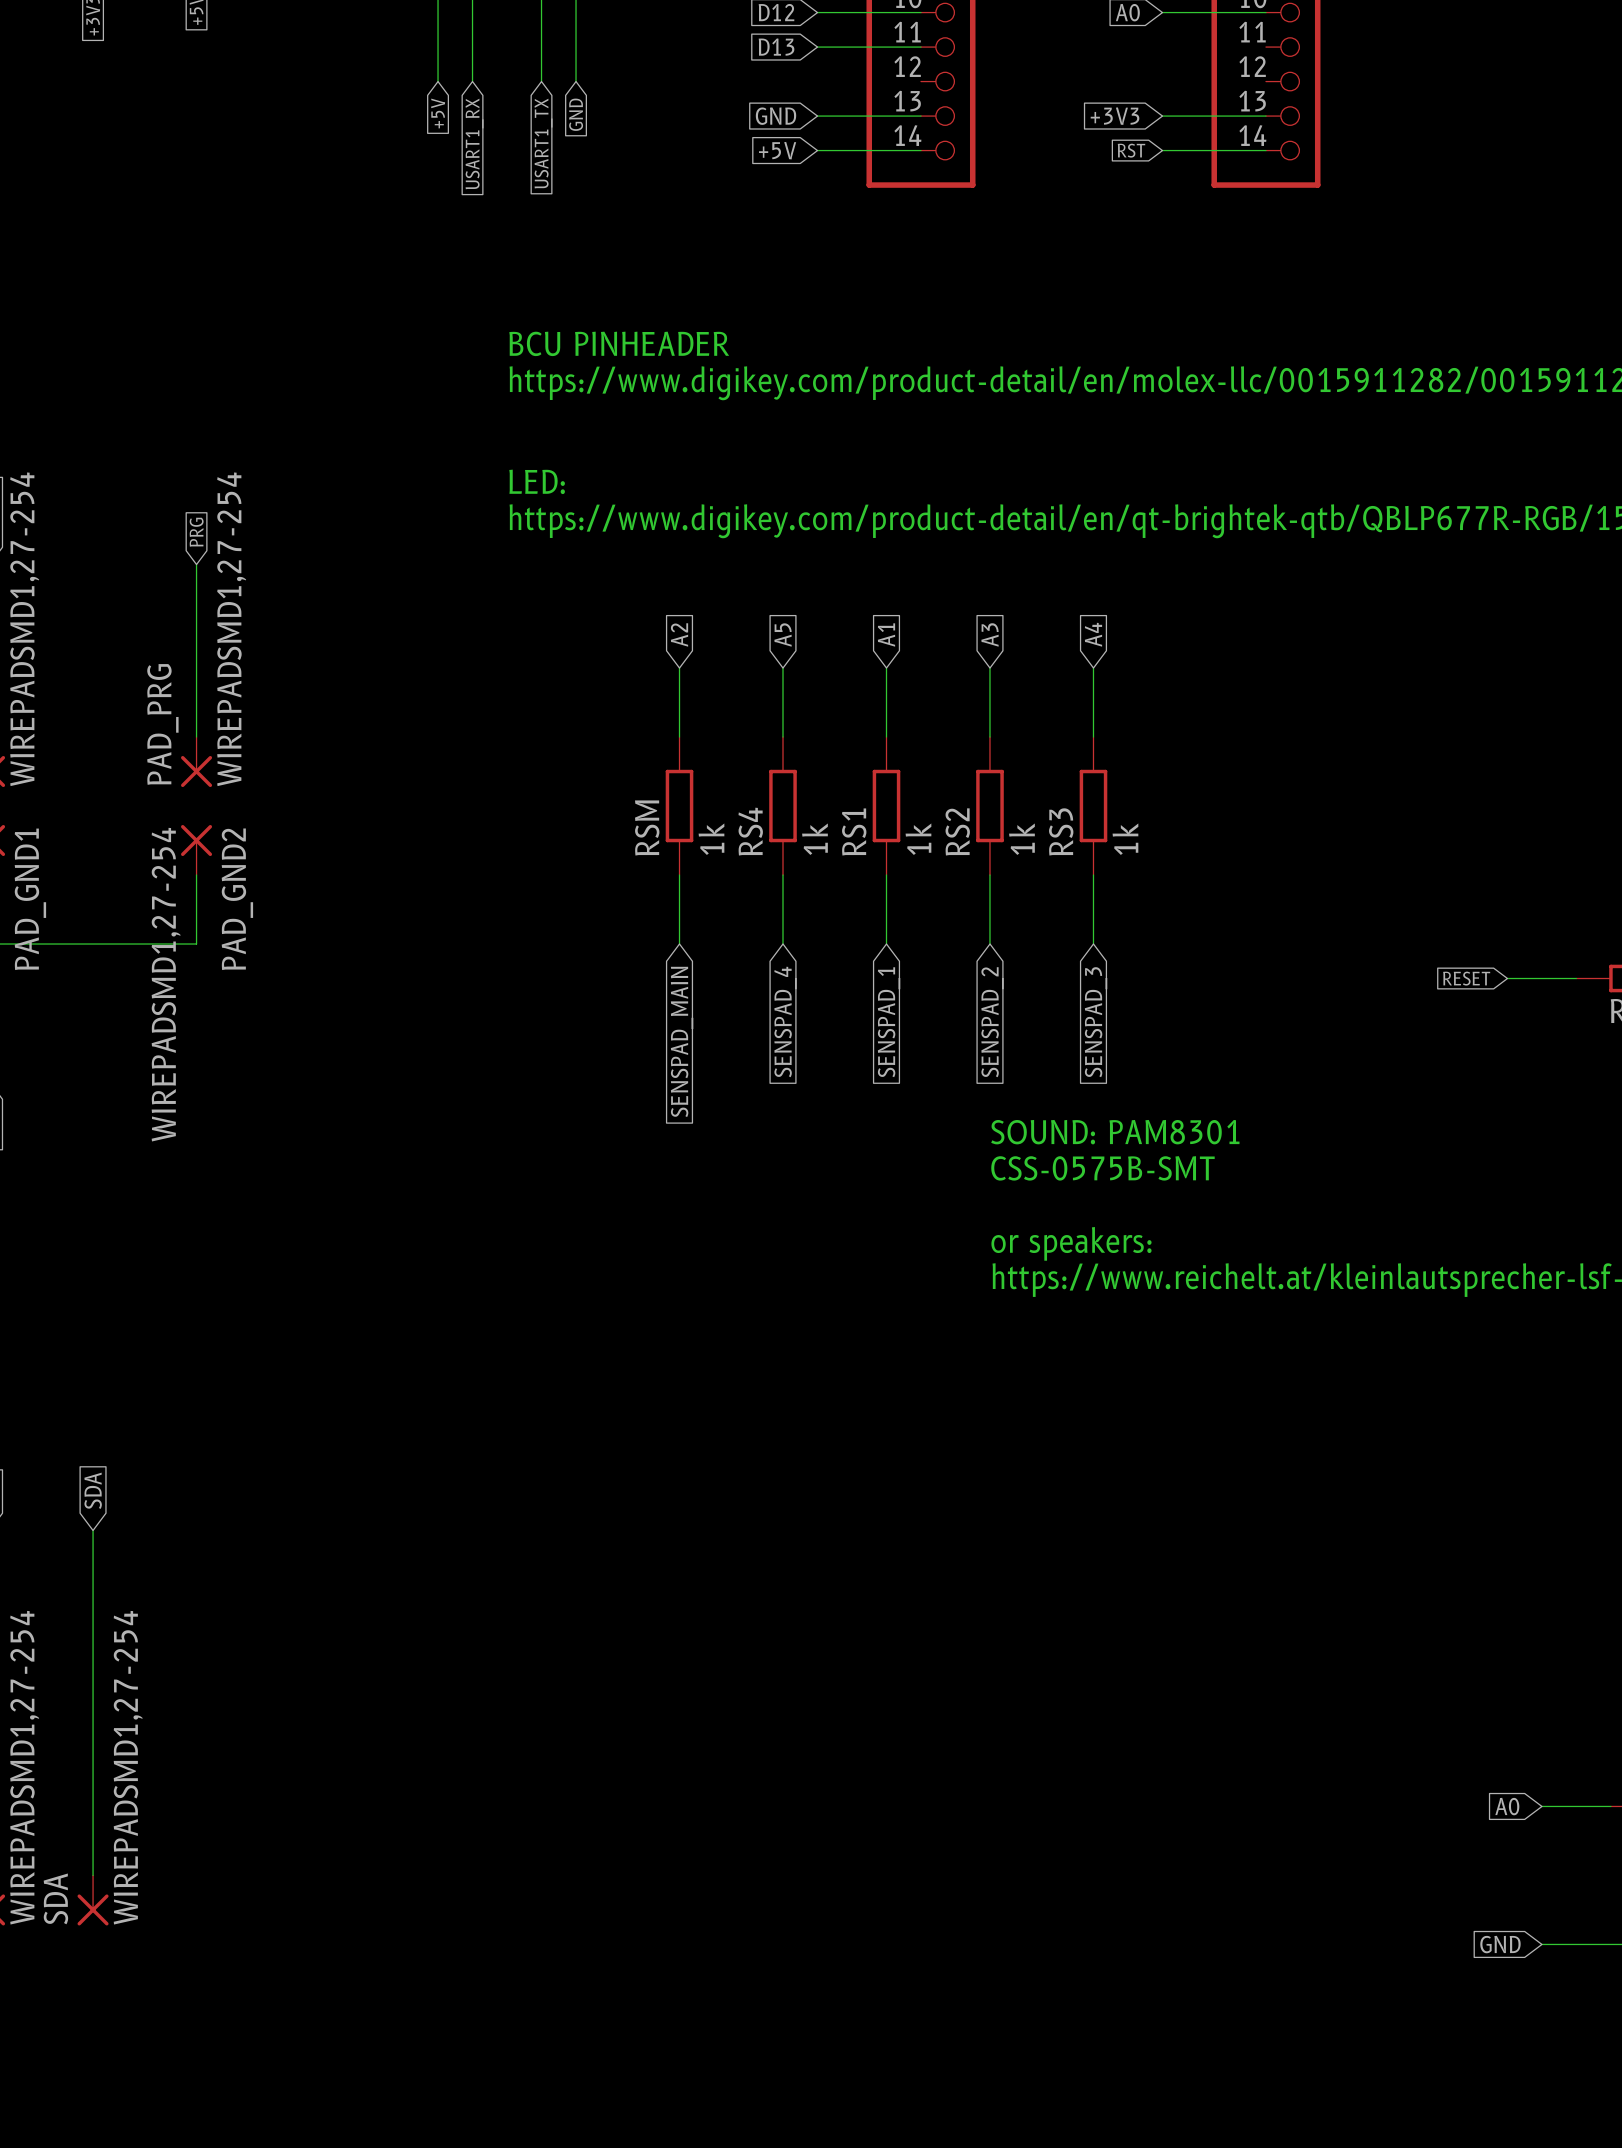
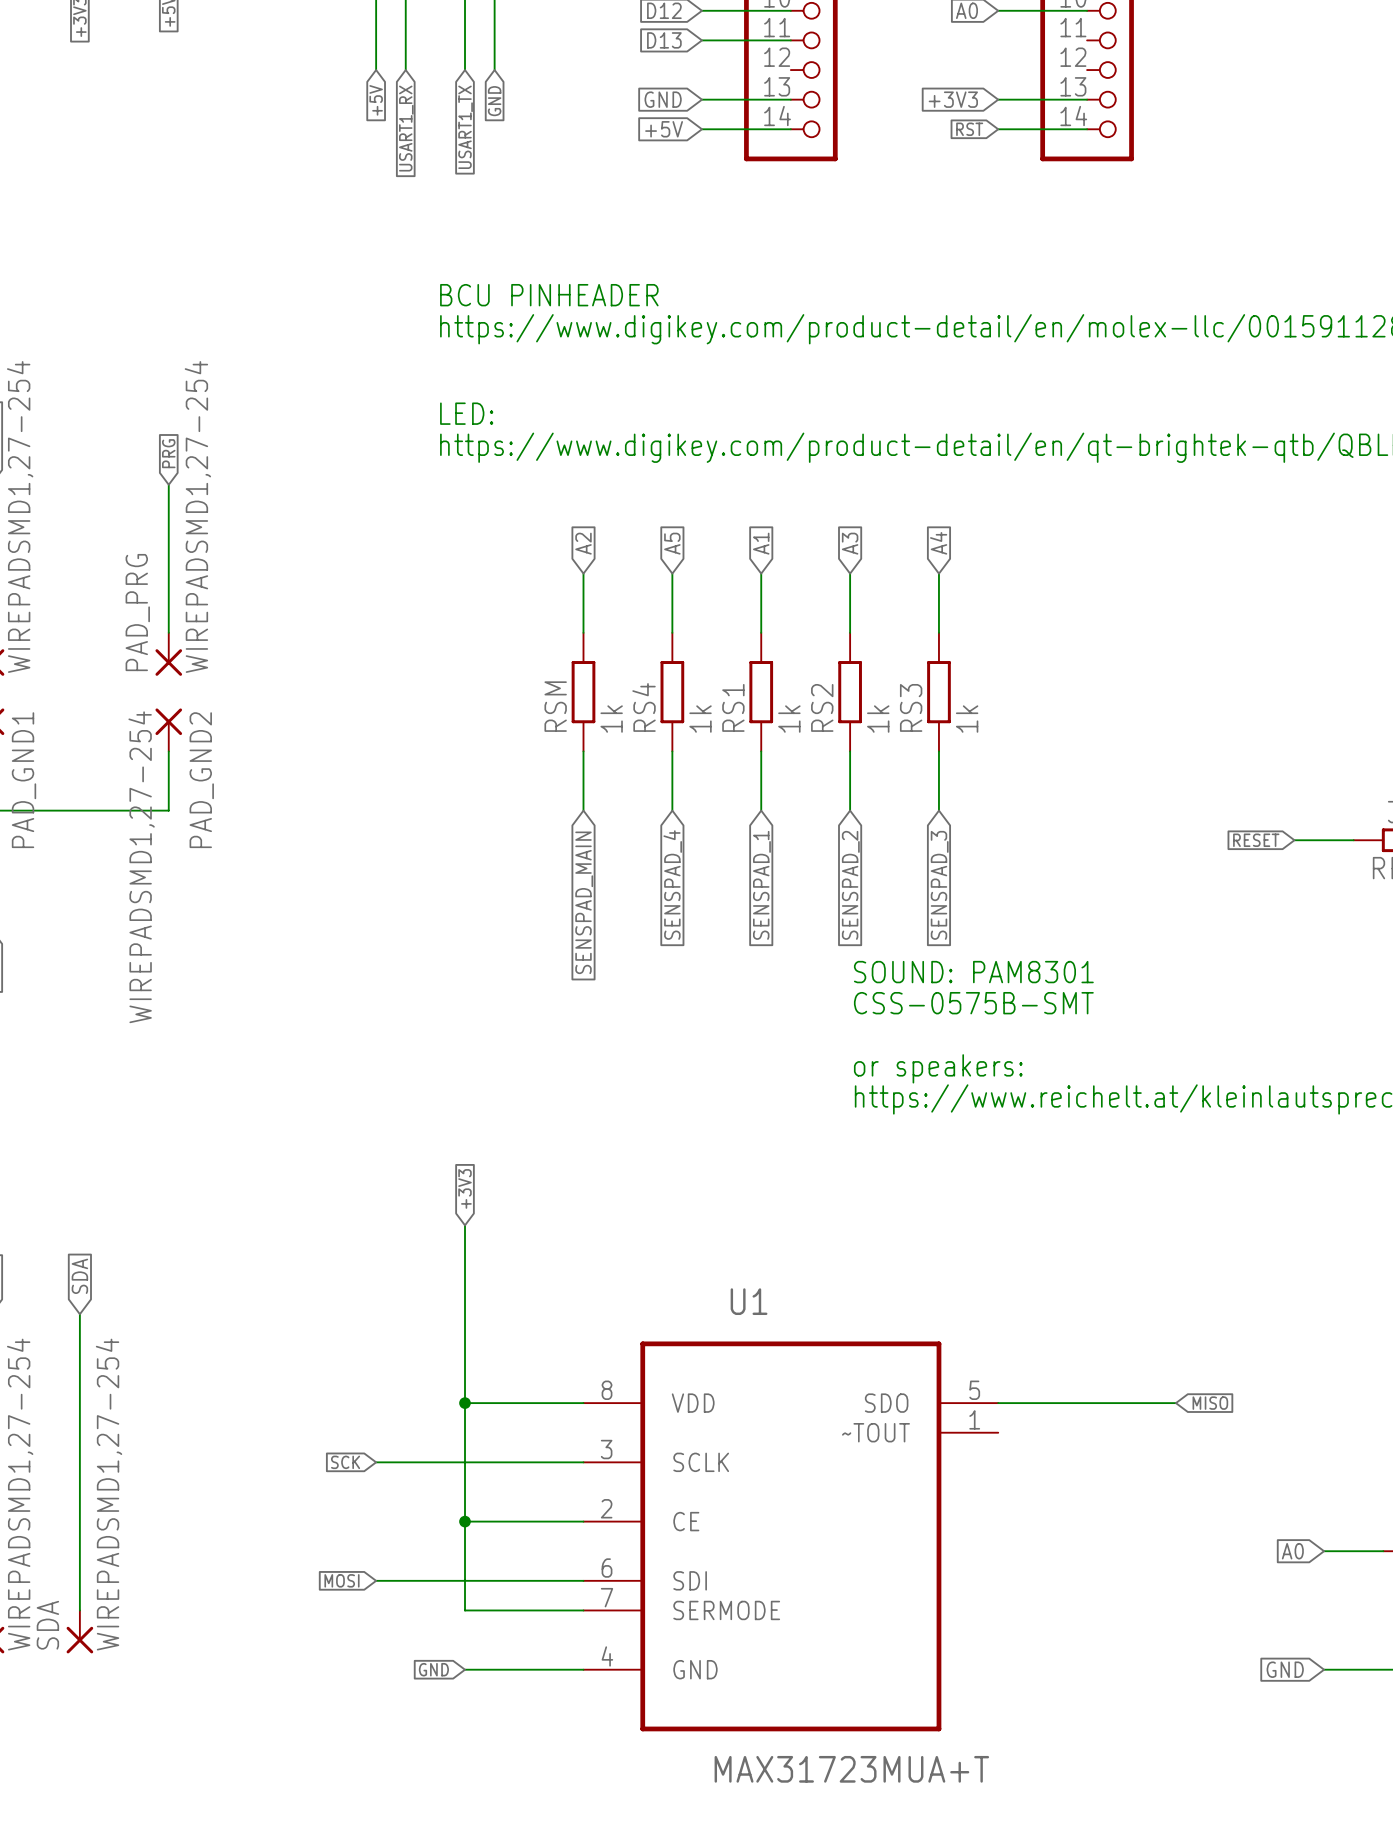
global label: none -> +3V3 (465, 1188)
wire: none -> (465, 1225) (465, 1610) (583, 1610)
wire: none -> (465, 1403) (583, 1403)
junction: none -> (465, 1403)
wire: none -> (998, 1403) (1175, 1403)
global label: none -> MISO (1210, 1403)
wire: none -> (376, 1462) (583, 1462)
global label: none -> SCK (345, 1462)
wire: none -> (465, 1521) (583, 1521)
junction: none -> (465, 1521)
U1: none -> MAX31723MUA+T (790, 1536)
wire: none -> (376, 1580) (583, 1580)
global label: none -> MOSI (341, 1580)
global label: none -> GND (433, 1669)
wire: none -> (465, 1669) (583, 1669)

